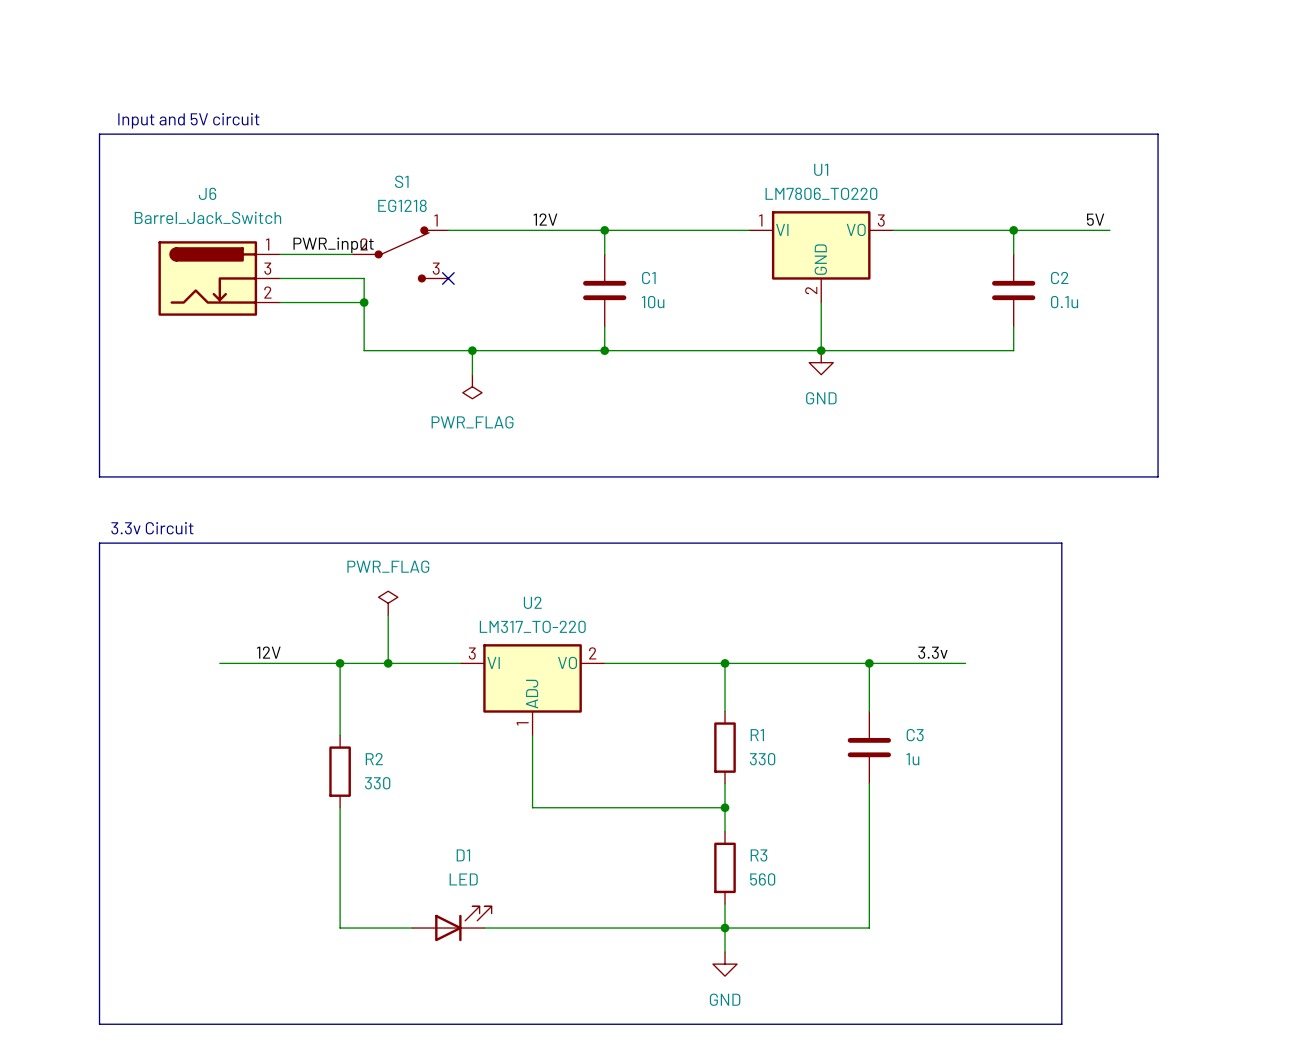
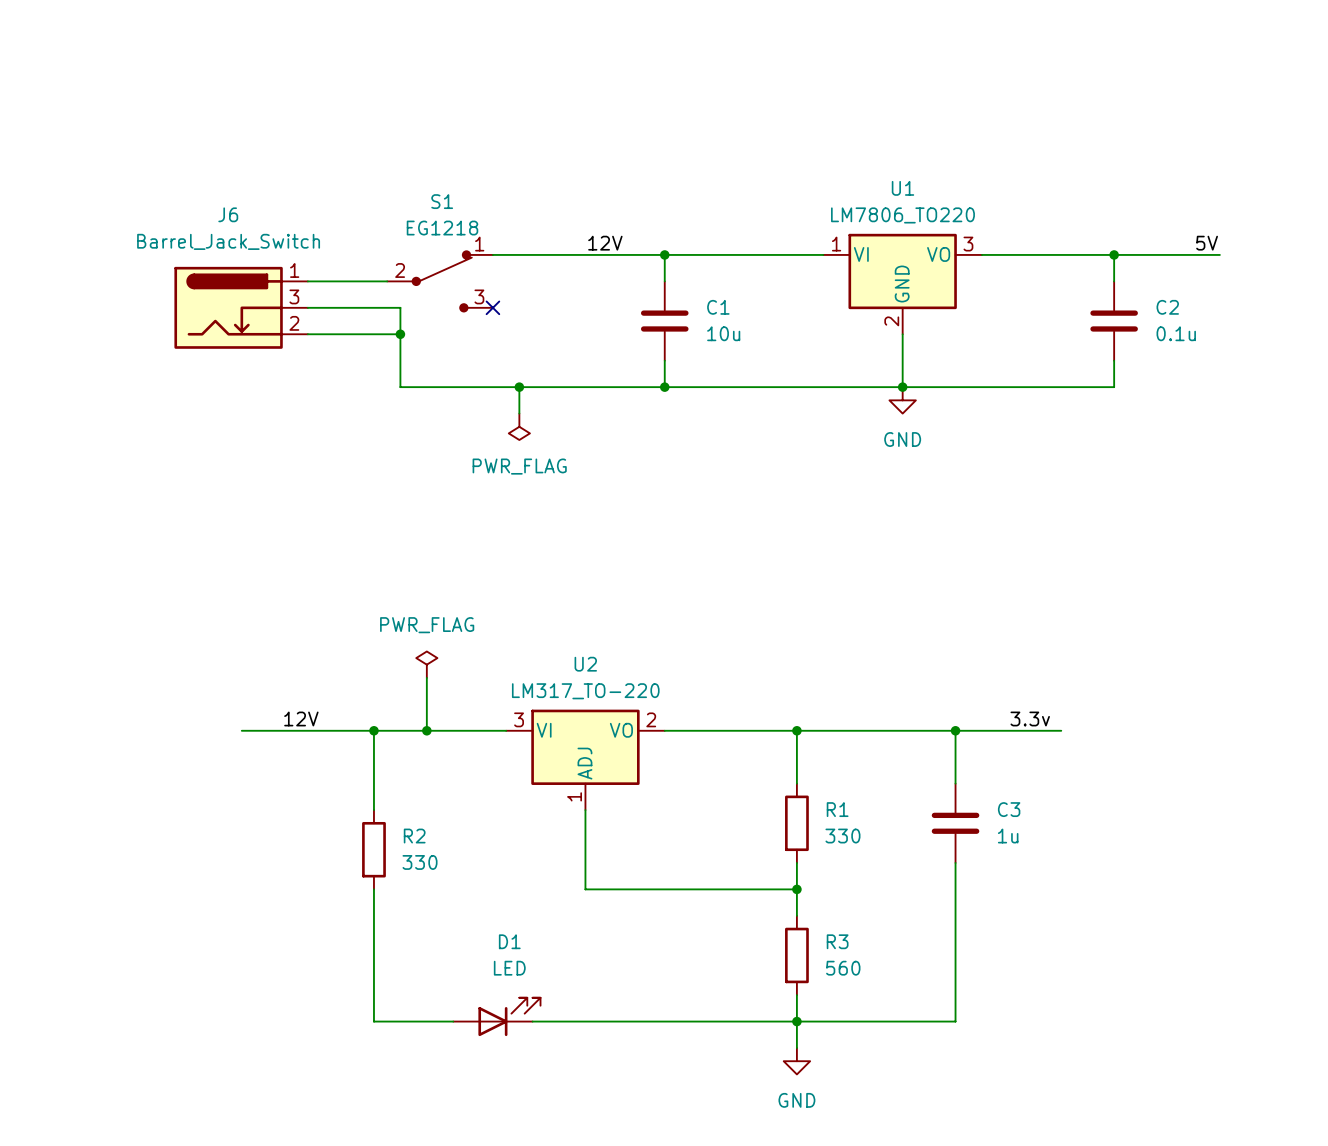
text: Input and 5V circuit (188, 120) -> none
line: (99, 134) (99, 476) (1158, 476) (1158, 134) (99, 134) -> none
label: PWR_input (333, 245) -> none
text: 3.3v Circuit (152, 528) -> none
line: (99, 543) (1061, 543) (1061, 1024) (99, 1024) (99, 543) -> none

